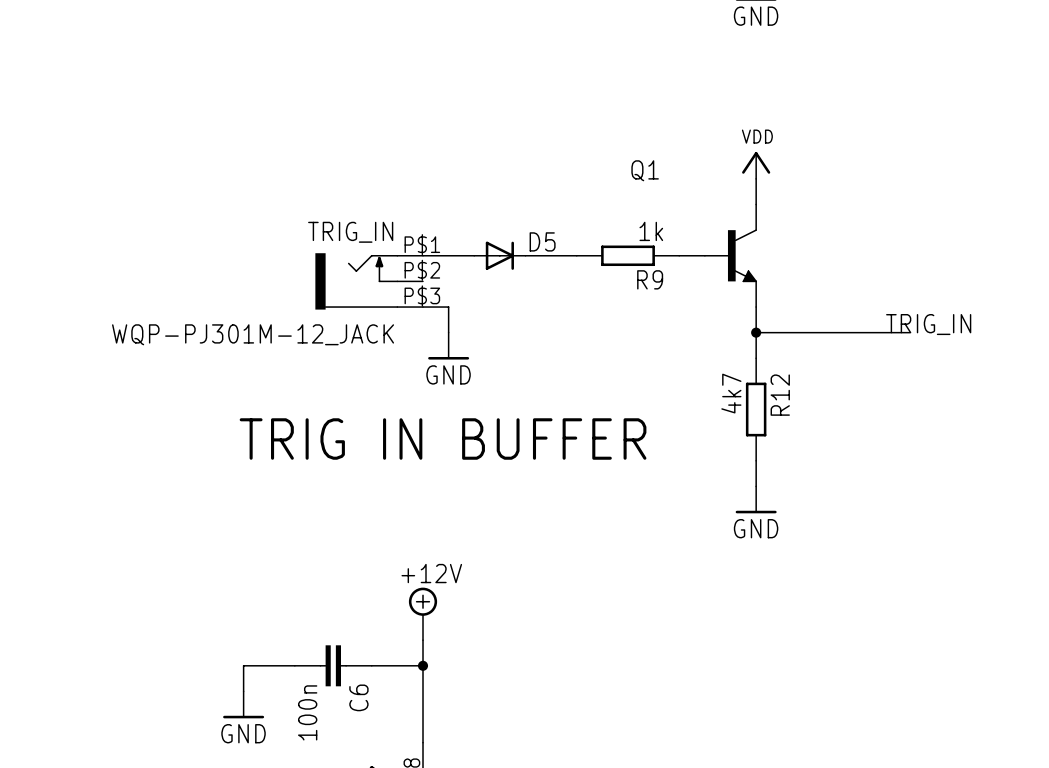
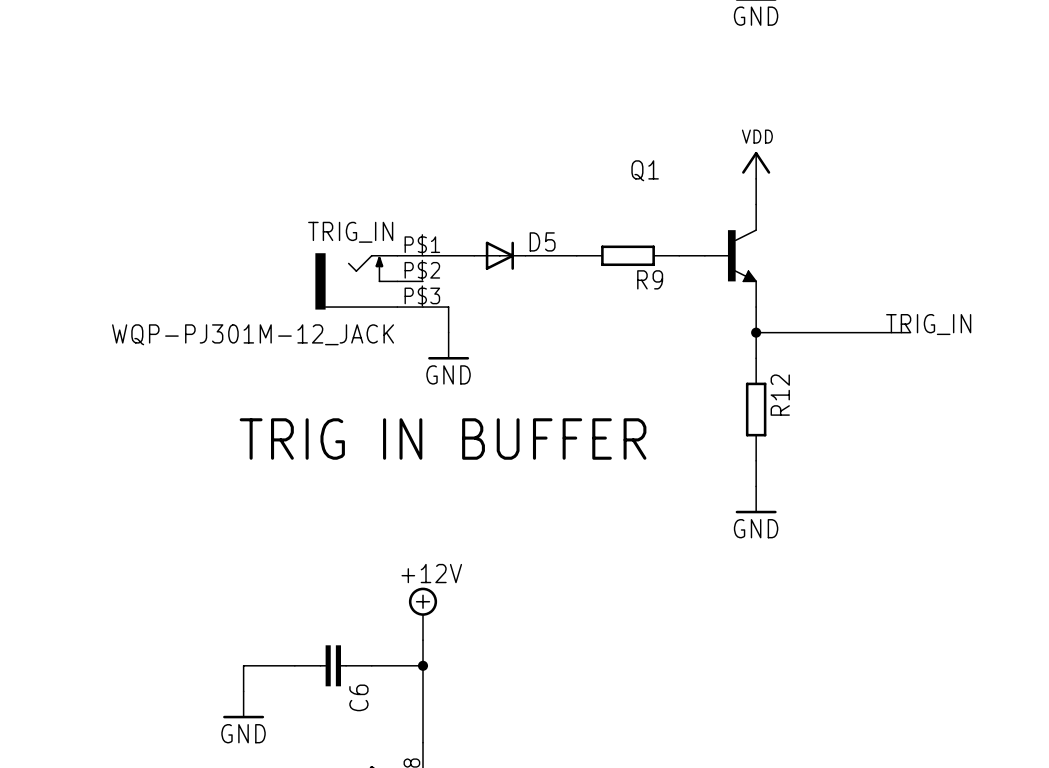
R9 value: 1k (651, 231) -> none
R12 value: 4k7 (731, 393) -> none
C6 value: 100n (307, 712) -> none

